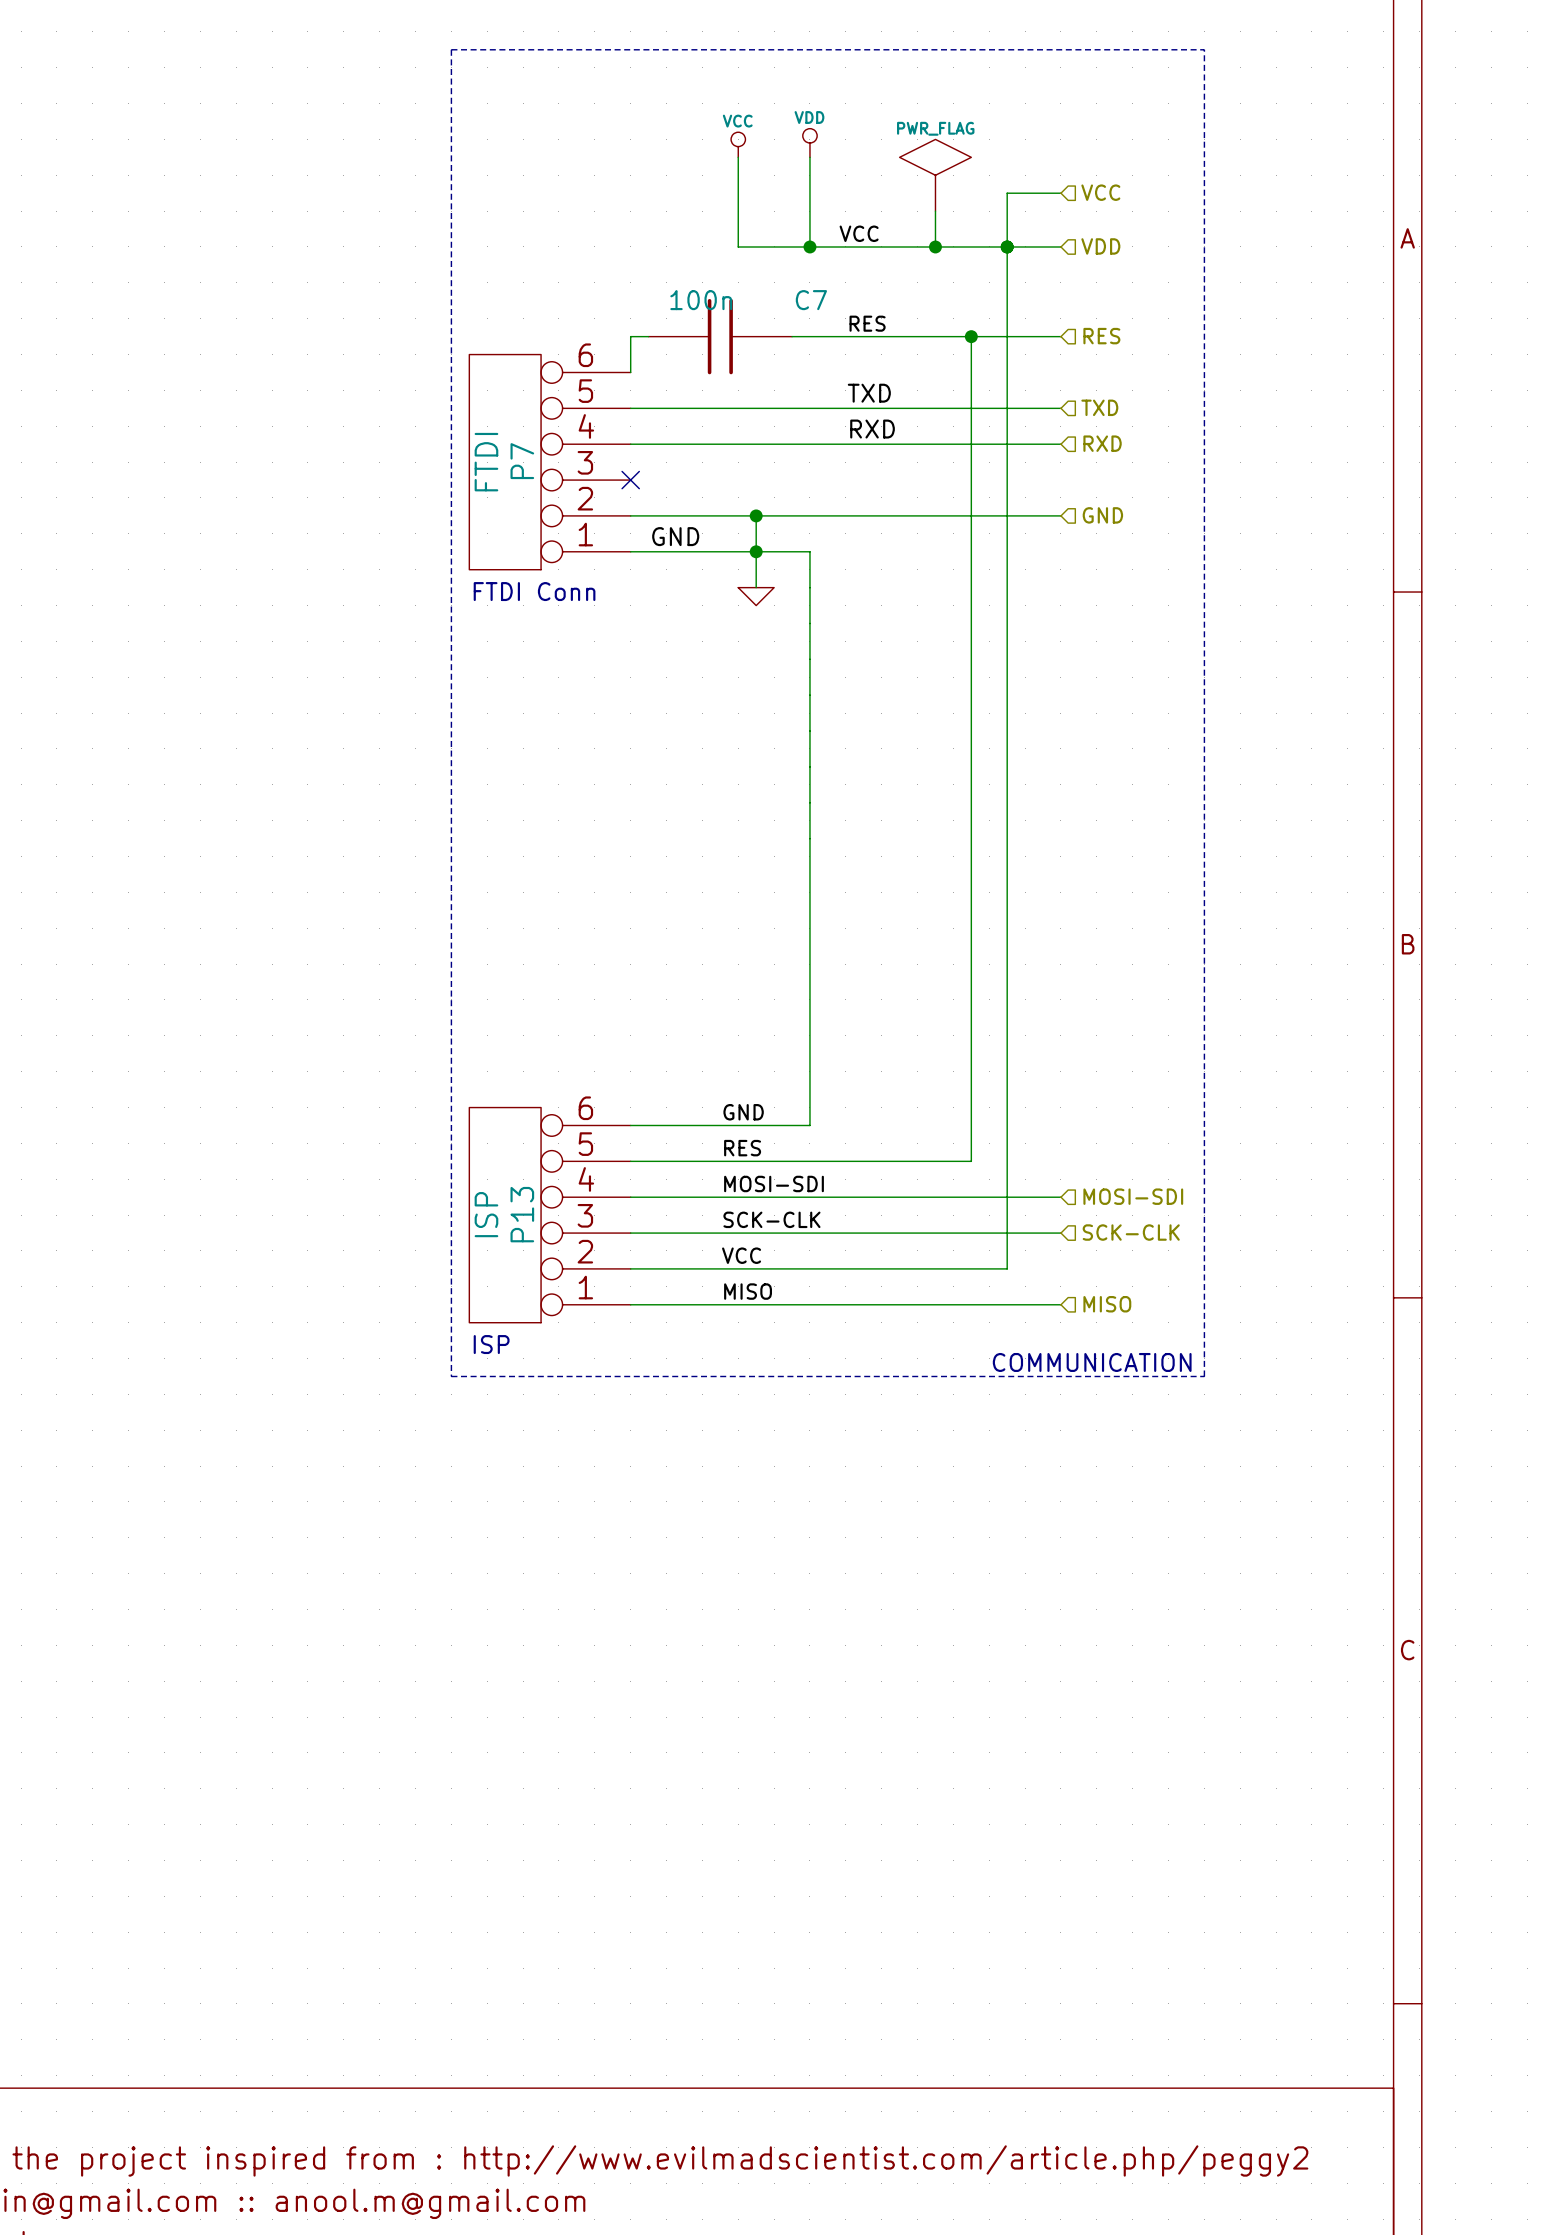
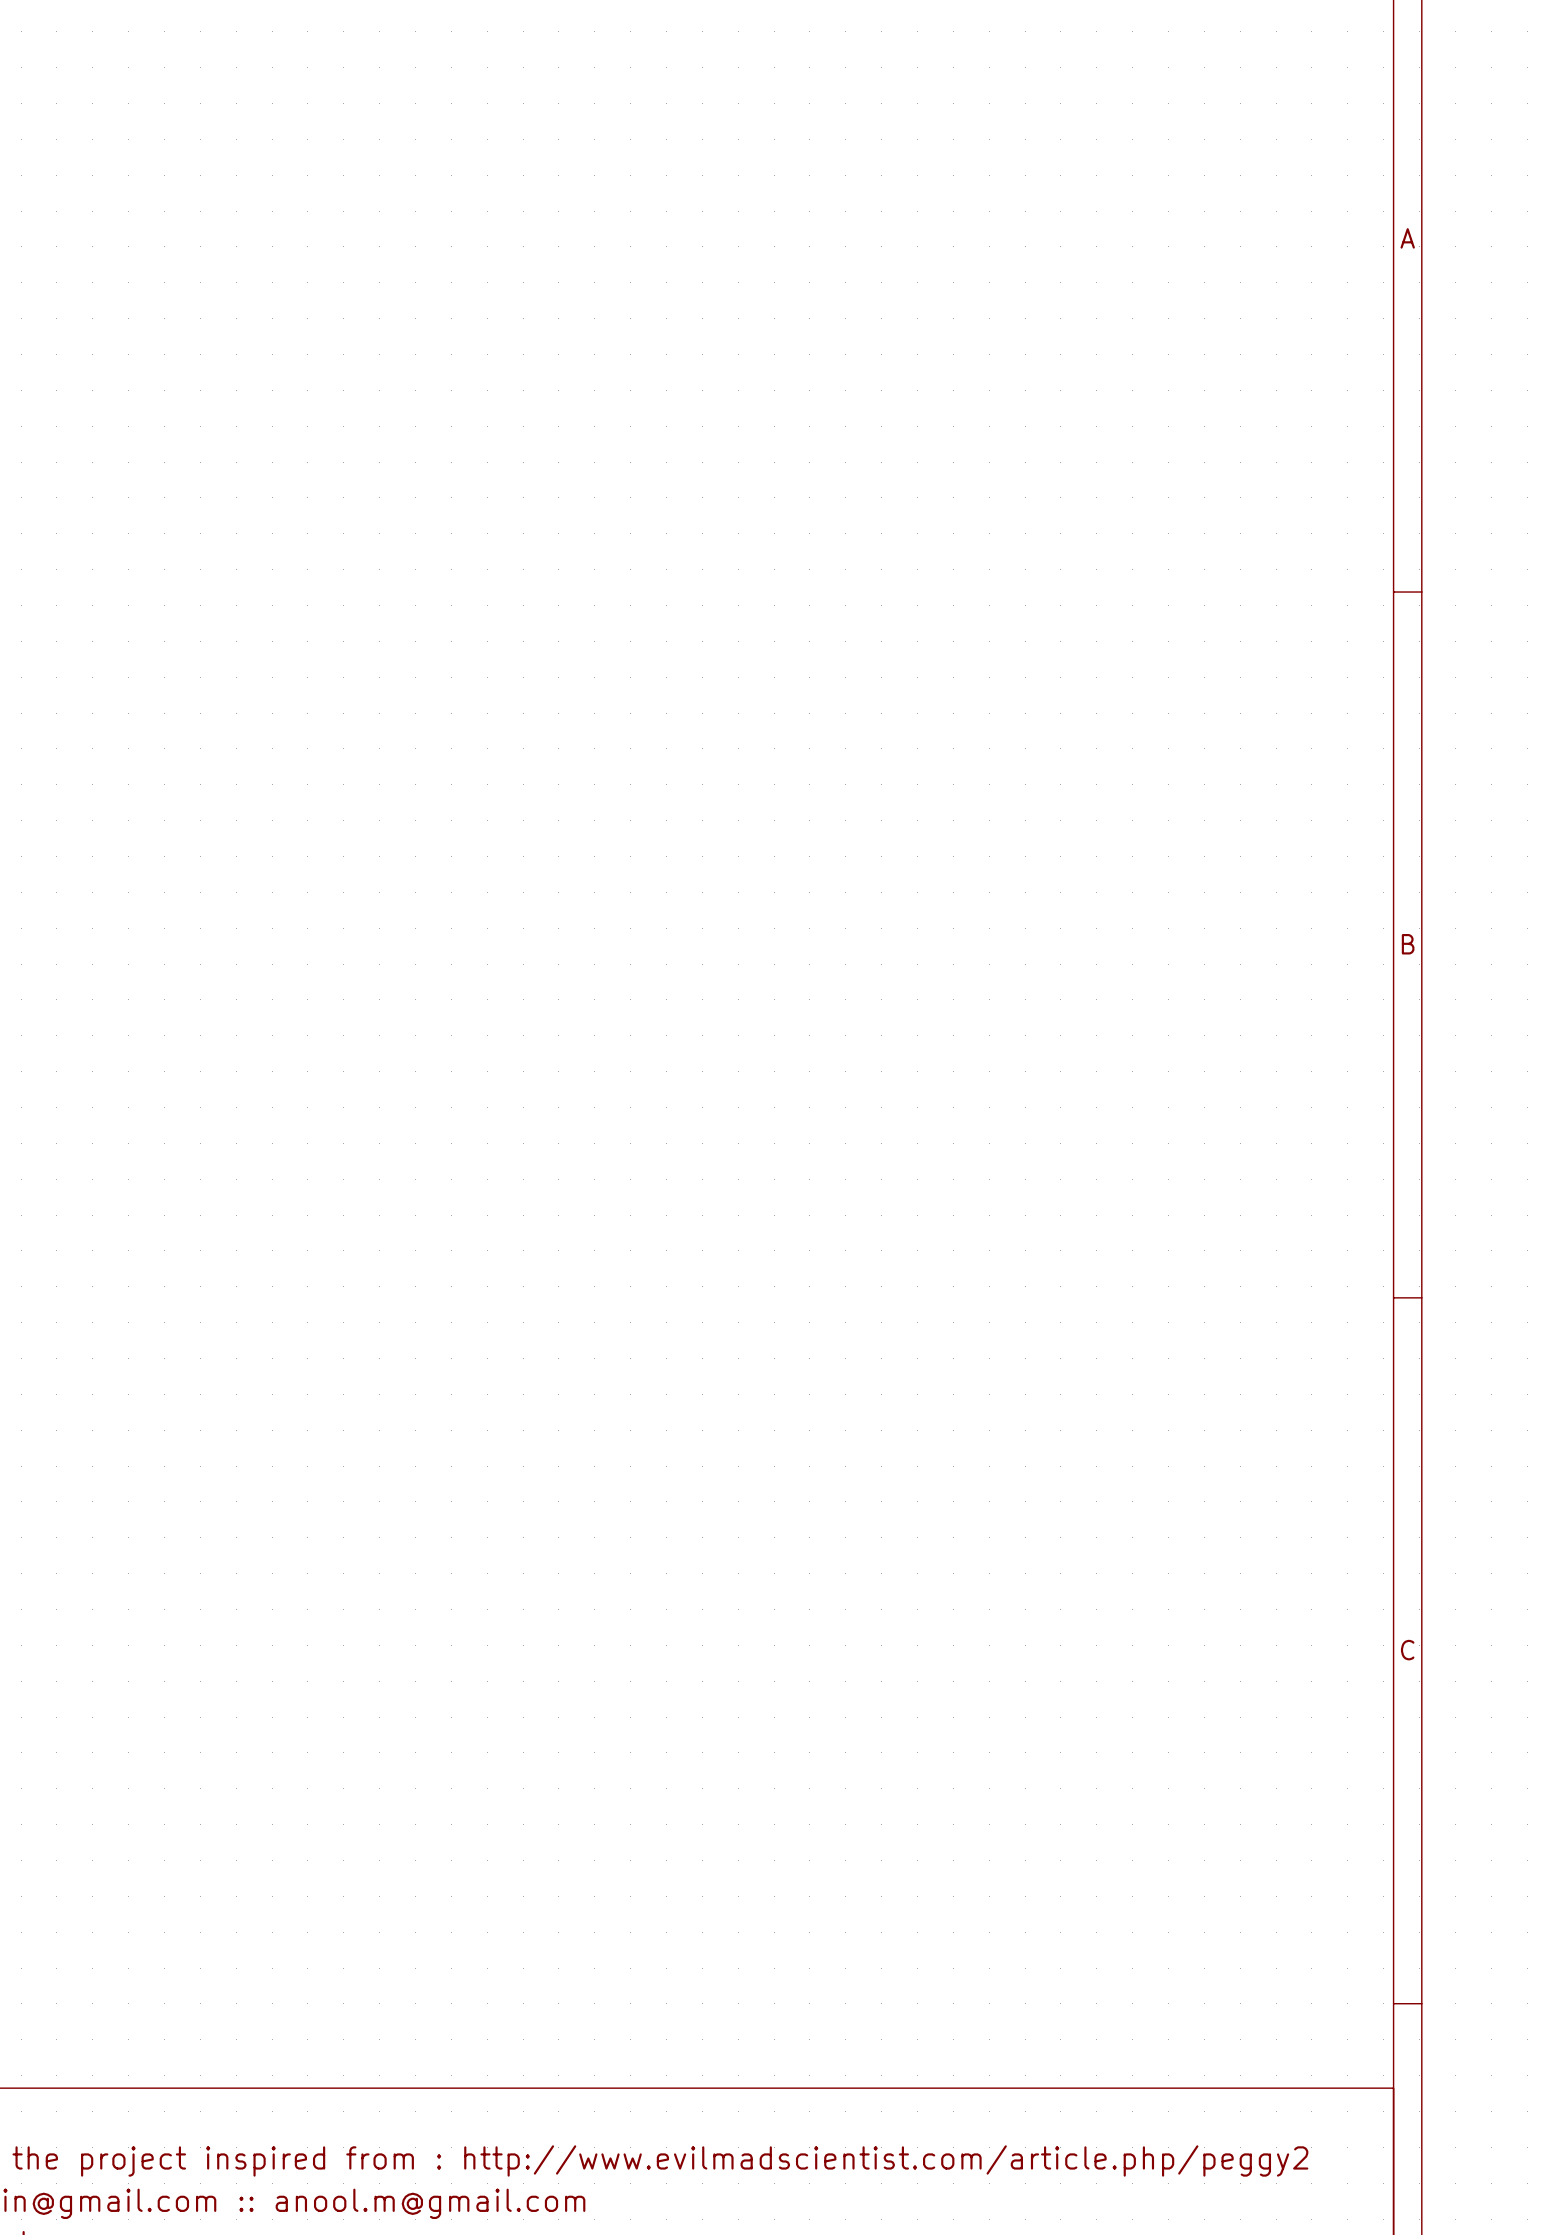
line: (451, 49) (1204, 49) (1204, 1376) (451, 1376) (451, 49) -> none
power symbol: VDD (809, 143) -> none
power symbol: VCC (738, 144) -> none
wire: (738, 157) (738, 246) (1060, 246) -> none
wire: (809, 157) (809, 246) -> none
power symbol: PWR_FLAG (935, 175) -> none
hierarchical label: VCC (1100, 192) -> none
wire: (1060, 193) (1007, 193) (1007, 1268) (630, 1268) -> none
wire: (935, 211) (935, 246) -> none
label: VCC (859, 233) -> none
junction: (809, 246) -> none
junction: (935, 246) -> none
junction: (1007, 246) -> none
hierarchical label: VDD (1100, 246) -> none
label: RES (867, 323) -> none
wire: (648, 336) (630, 336) (630, 372) -> none
C7: 100n (720, 336) -> none
wire: (792, 336) (1060, 336) -> none
wire: (971, 336) (971, 1161) (630, 1161) -> none
junction: (971, 336) -> none
hierarchical label: RES (1101, 336) -> none
label: TXD (869, 393) -> none
hierarchical label: TXD (1099, 407) -> none
wire: (630, 408) (1060, 408) -> none
label: RXD (872, 429) -> none
hierarchical label: RXD (1102, 443) -> none
wire: (630, 444) (1060, 444) -> none
P7: FTDI (550, 462) -> none
no-connect mark: (630, 480) -> none
wire: (630, 515) (1060, 515) -> none
wire: (756, 515) (756, 587) -> none
junction: (756, 515) -> none
hierarchical label: GND (1102, 515) -> none
label: GND (675, 536) -> none
wire: (630, 551) (809, 551) (809, 1125) (630, 1125) -> none
junction: (756, 551) -> none
text: FTDI Conn (534, 591) -> none
power symbol: (756, 596) -> none
label: GND (743, 1112) -> none
label: RES (742, 1148) -> none
label: MOSI-SDI (774, 1183) -> none
hierarchical label: MOSI-SDI (1133, 1196) -> none
wire: (630, 1197) (1060, 1197) -> none
P13: ISP (550, 1215) -> none
label: SCK-CLK (771, 1219) -> none
hierarchical label: SCK-CLK (1131, 1232) -> none
wire: (630, 1233) (1060, 1233) -> none
label: VCC (741, 1255) -> none
label: MISO (748, 1291) -> none
wire: (630, 1304) (1060, 1304) -> none
hierarchical label: MISO (1107, 1304) -> none
text: ISP (491, 1344) -> none
text: COMMUNICATION (1092, 1362) -> none

